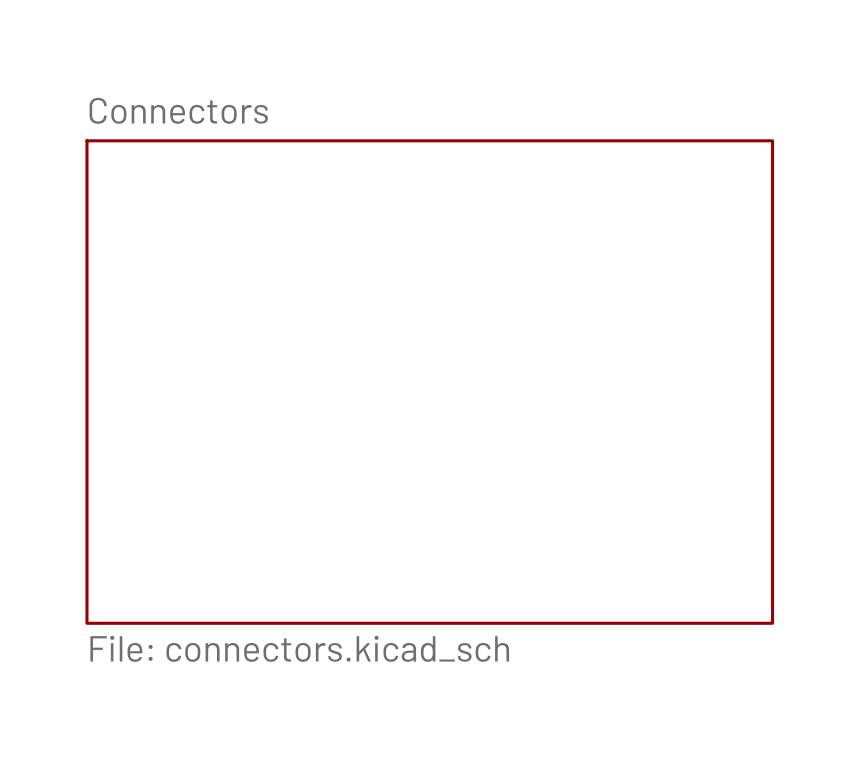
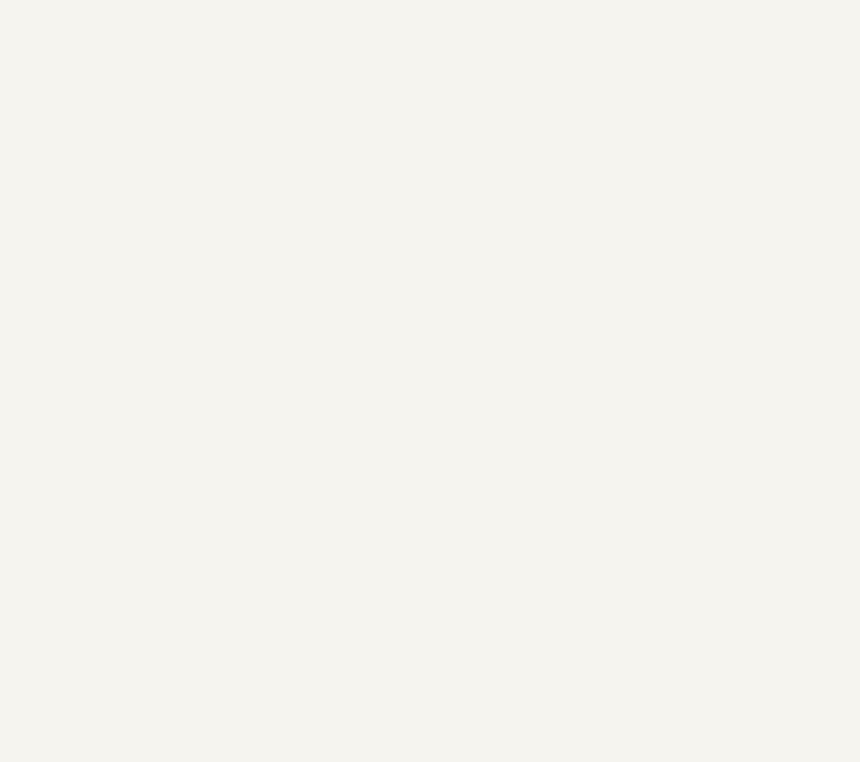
sheet Connectors: File: connectors.kicad_sch (429, 382) -> none

